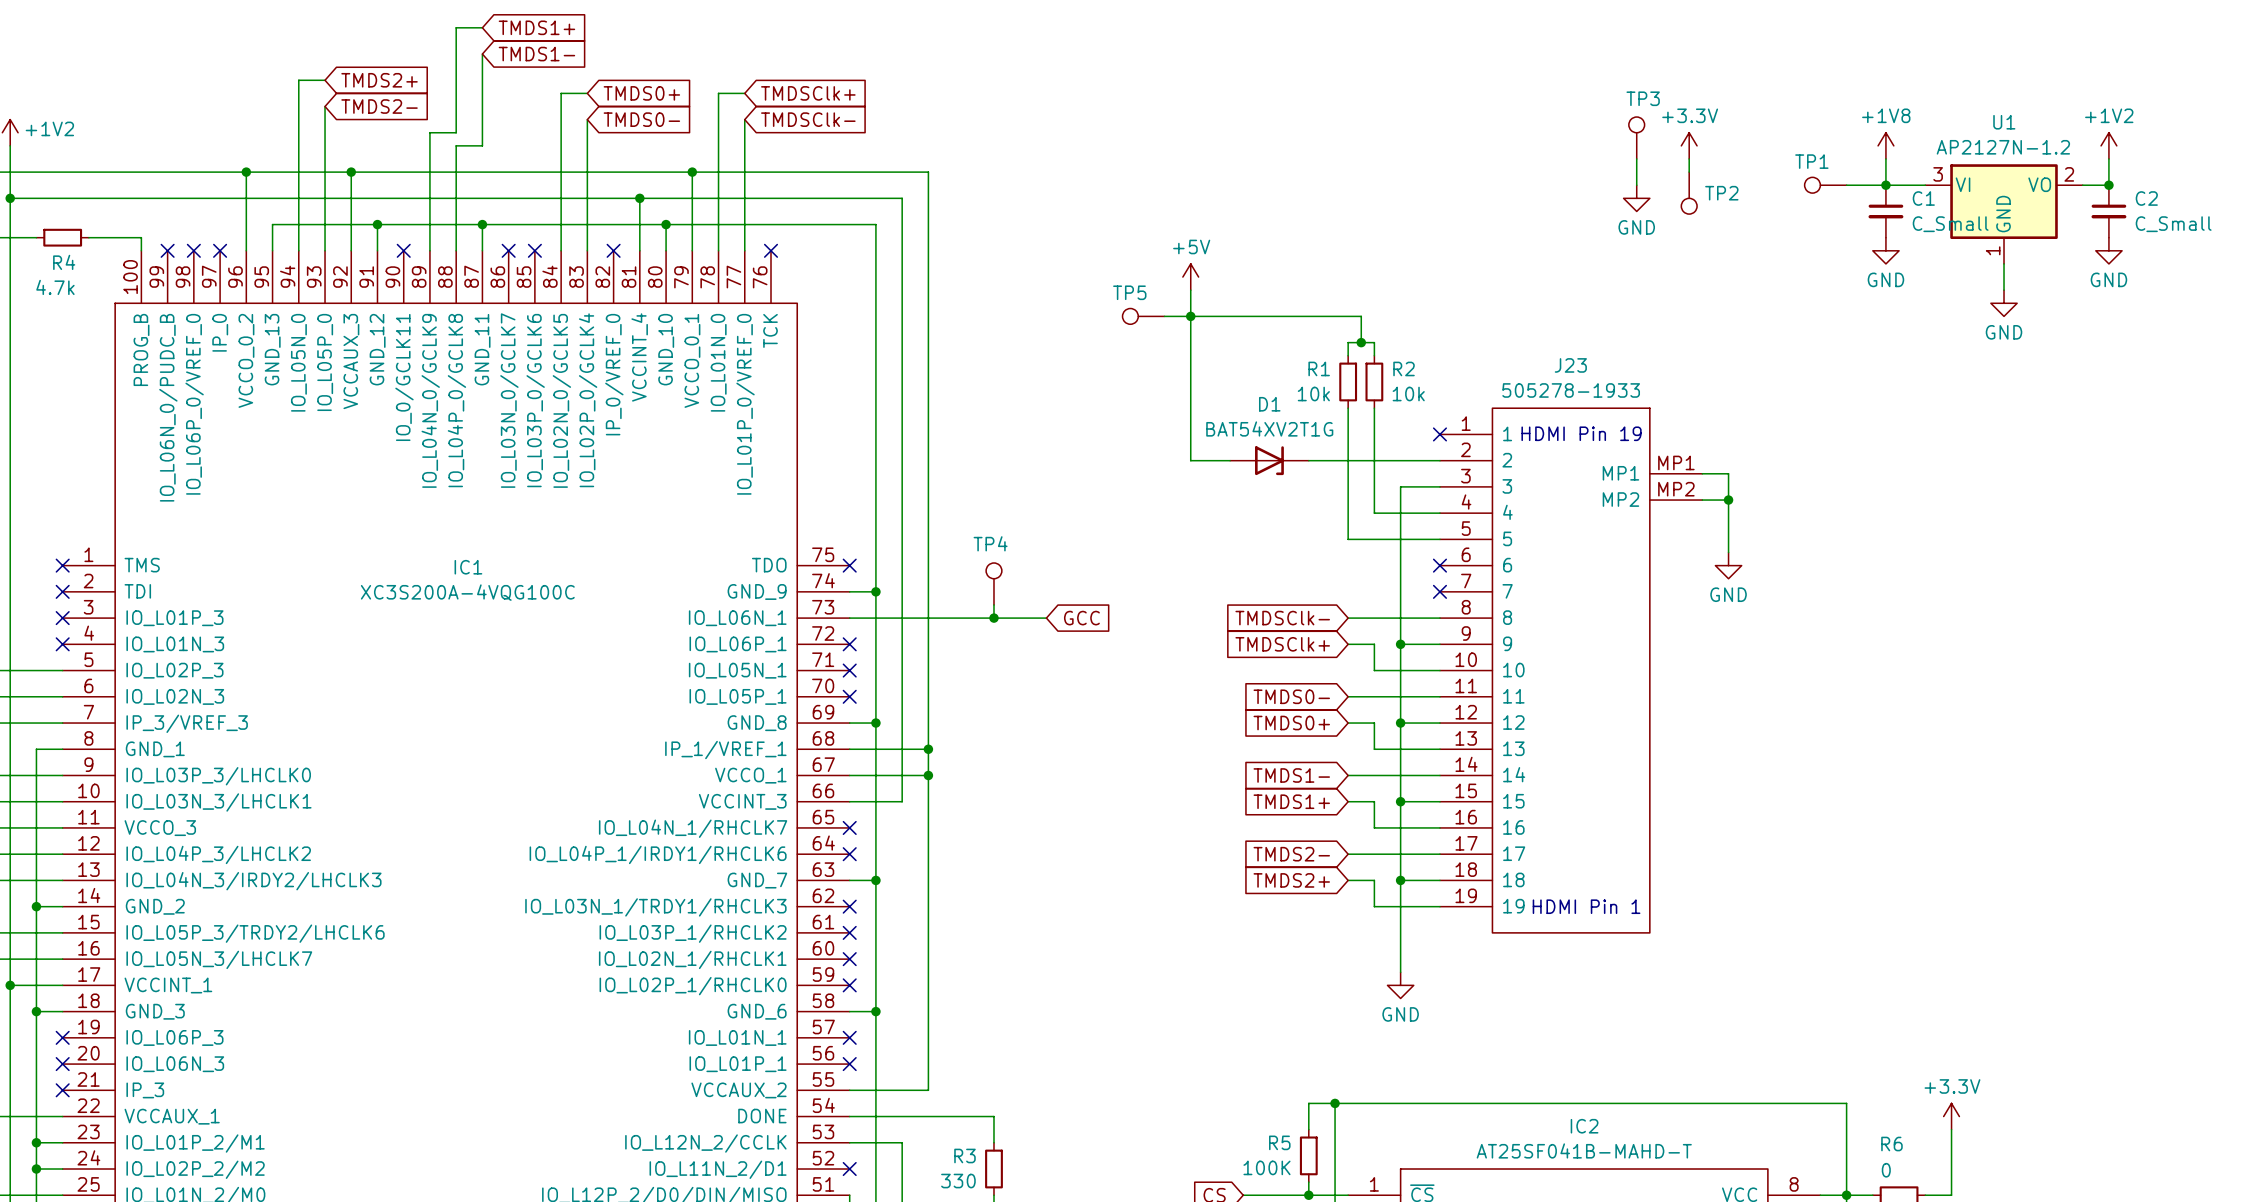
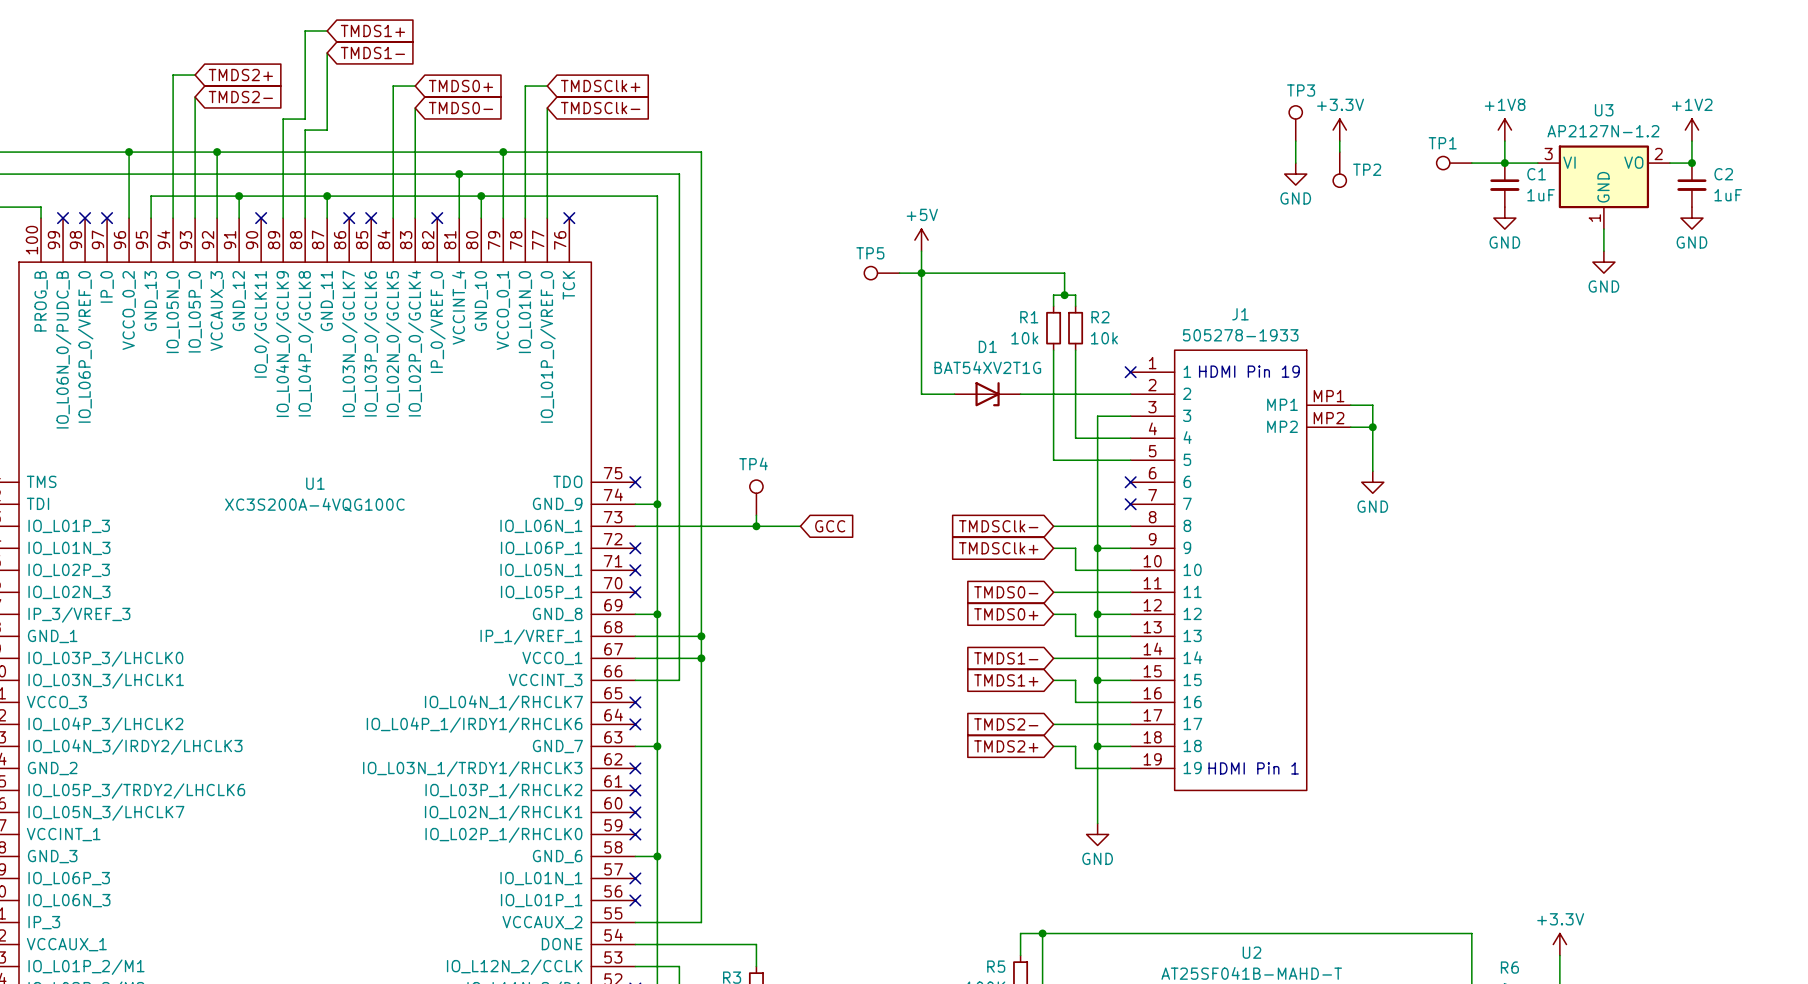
U1 name: U1 (2004, 122) -> U3 (1604, 110)
C1 value: C_Small (1950, 224) -> 1uF (1541, 195)
C2 value: C_Small (2173, 224) -> 1uF (1728, 195)
J23 name: J23 (1570, 365) -> J1 (1240, 314)
IC1 name: IC1 (468, 567) -> U1 (315, 483)
IC2 name: IC2 (1584, 1126) -> U2 (1251, 952)

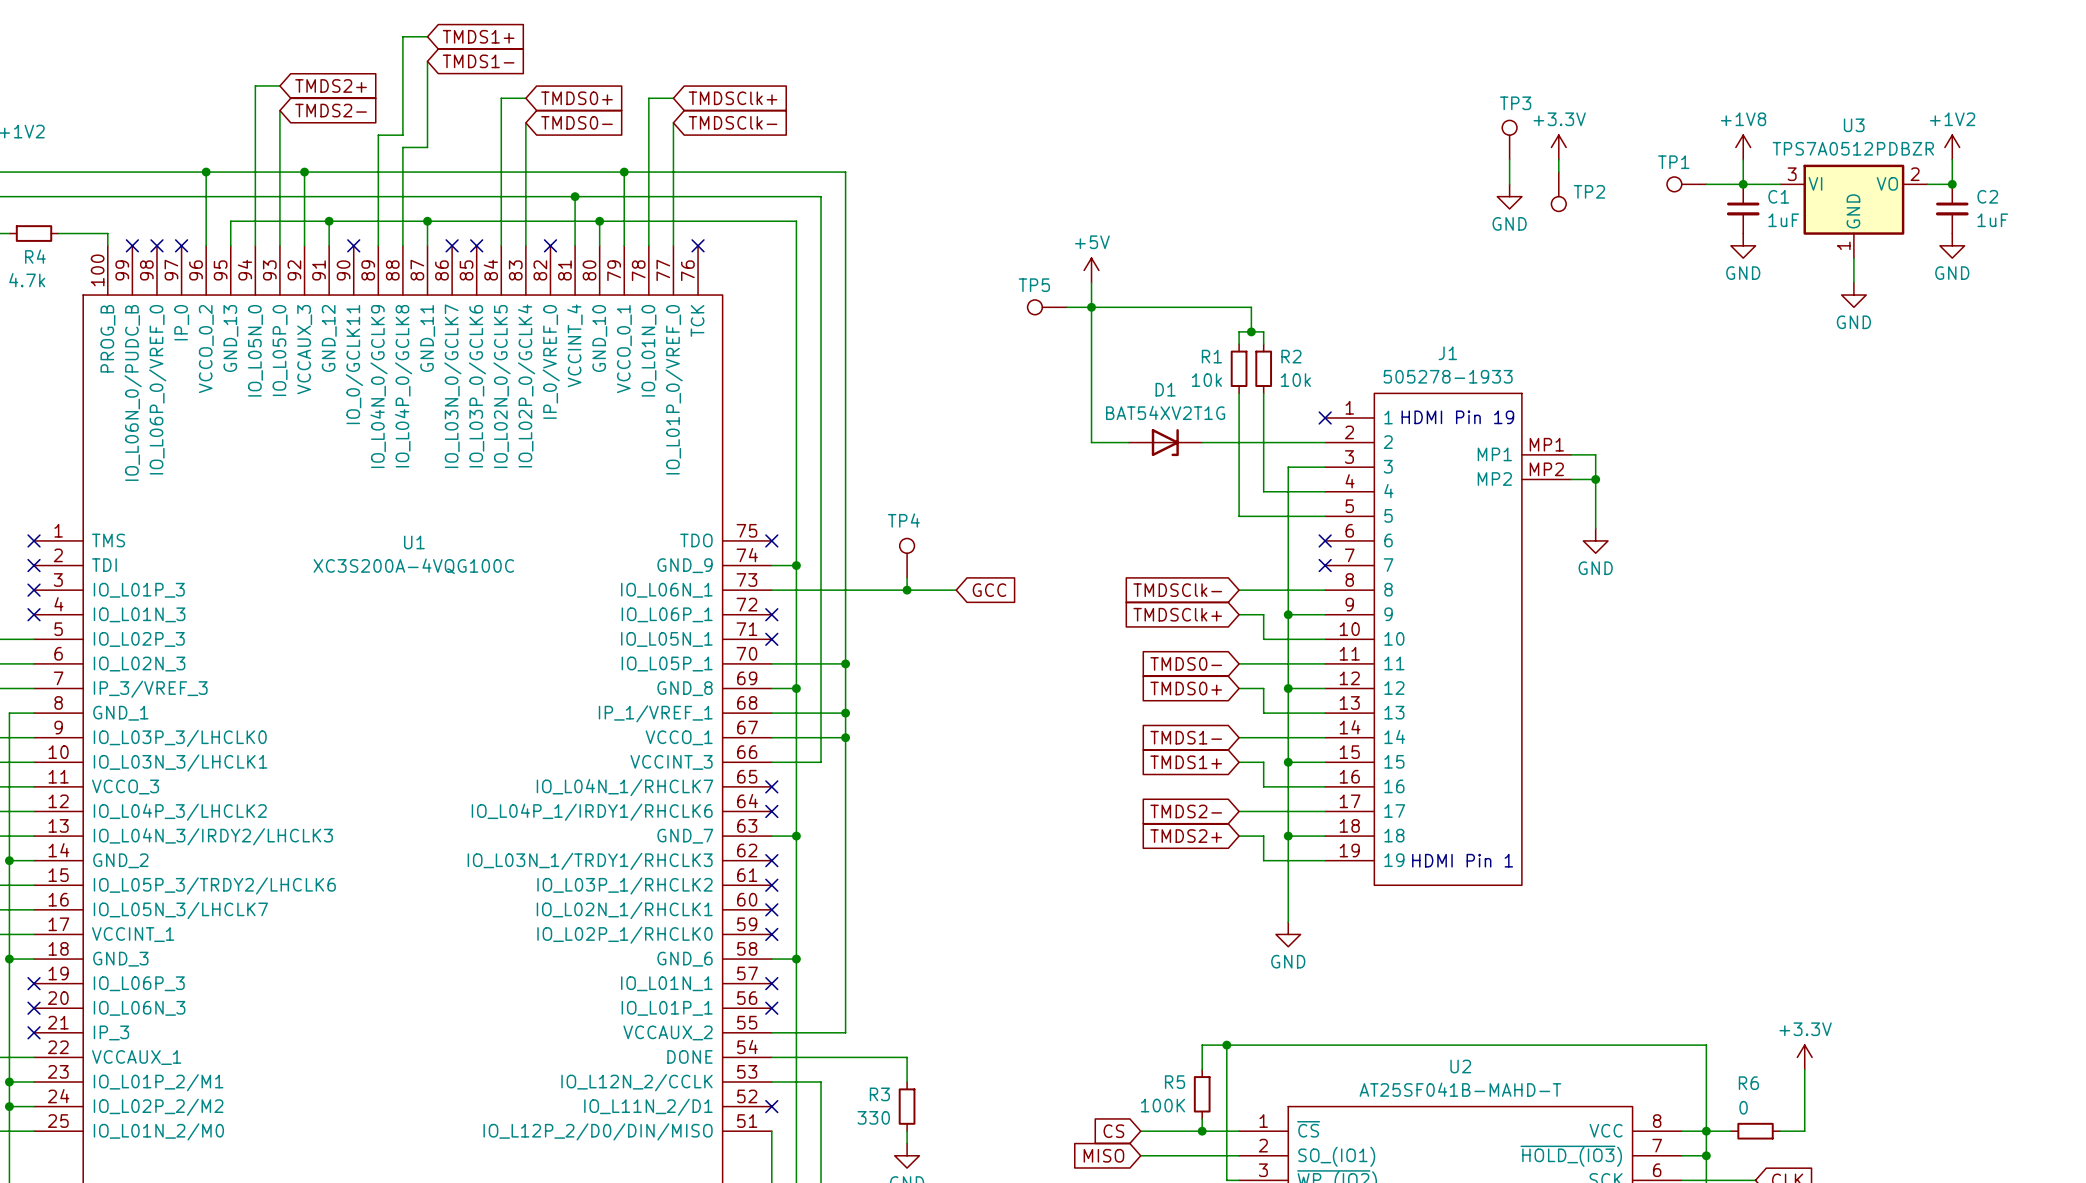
U3 value: AP2127N-1.2 (1603, 131) -> TPS7A0512PDBZR (1853, 148)
wire: none -> (771, 663) (845, 663)
no-connect mark: (635, 592) -> none
junction: none -> (845, 663)

